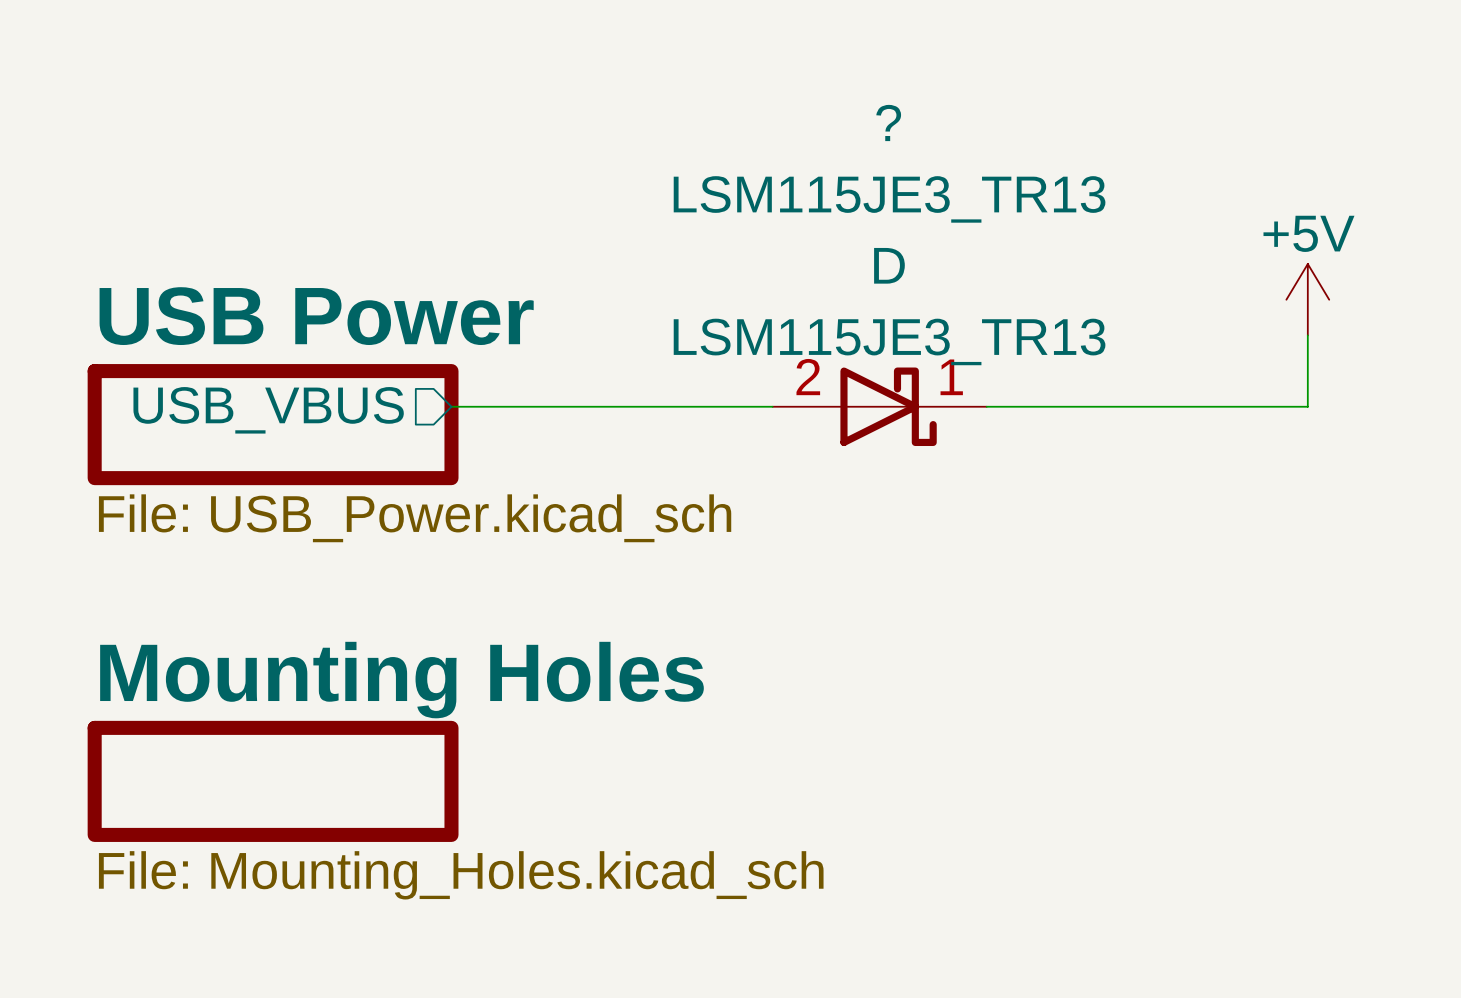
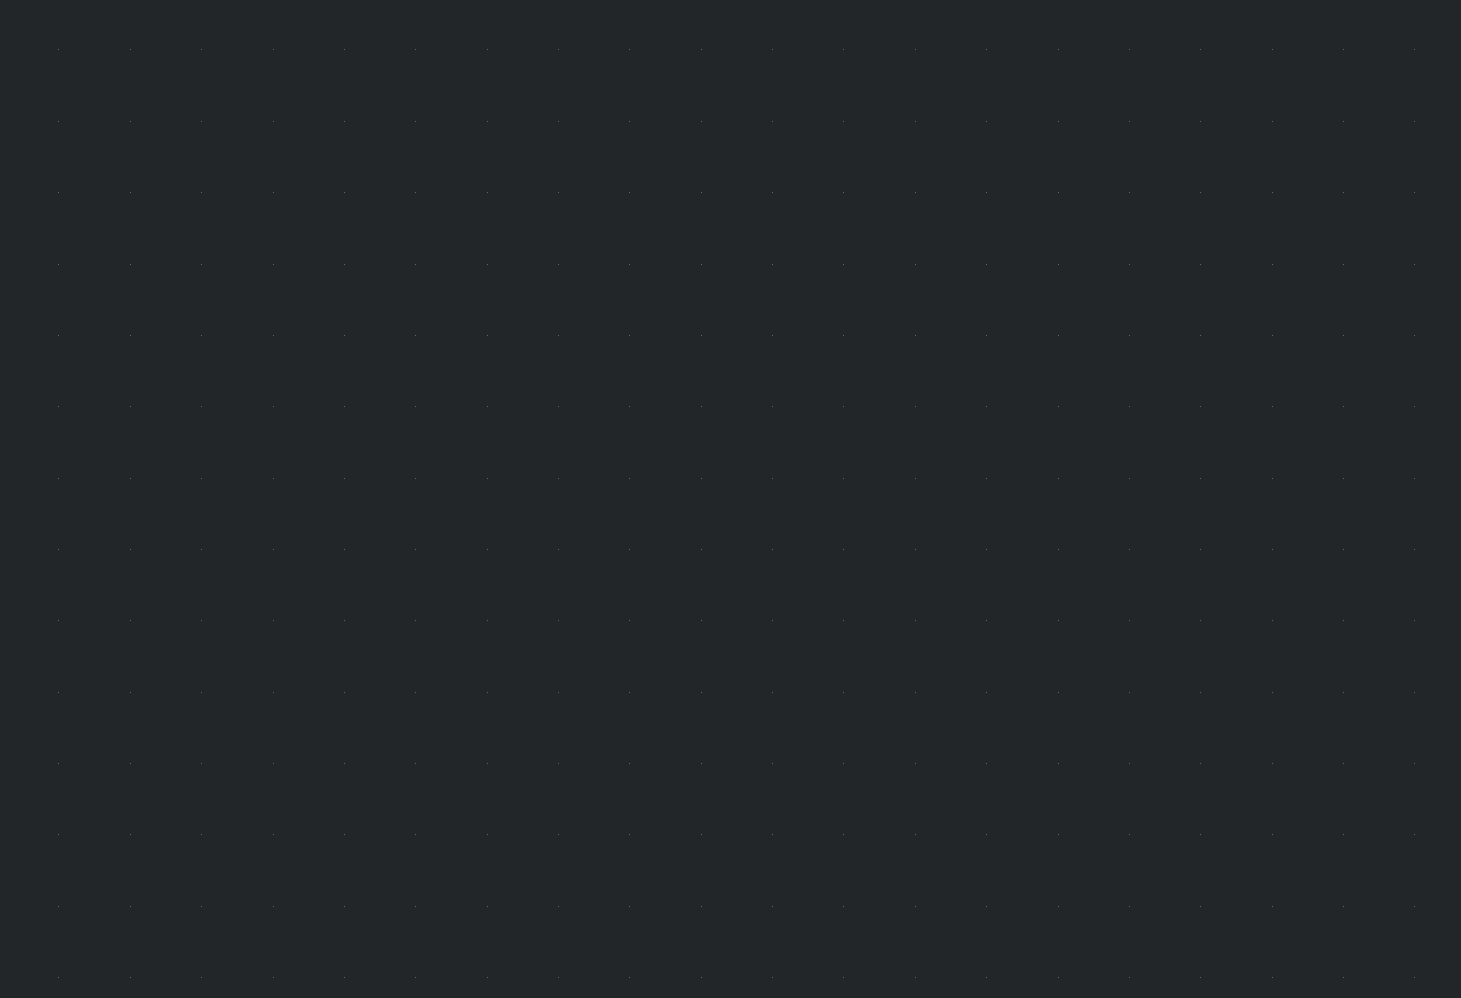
power symbol: +5V (1307, 299) -> none
wire: (1307, 335) (1307, 406) (986, 406) -> none
wire: (451, 406) (772, 406) -> none
part: LSM115JE3_TR13 (879, 406) -> none
sheet pin: USB_VBUS (268, 410) -> none
sheet USB Power: File: USB_Power.kicad_sch (273, 424) -> none
sheet Mounting Holes: File: Mounting_Holes.kicad_sch (273, 781) -> none

